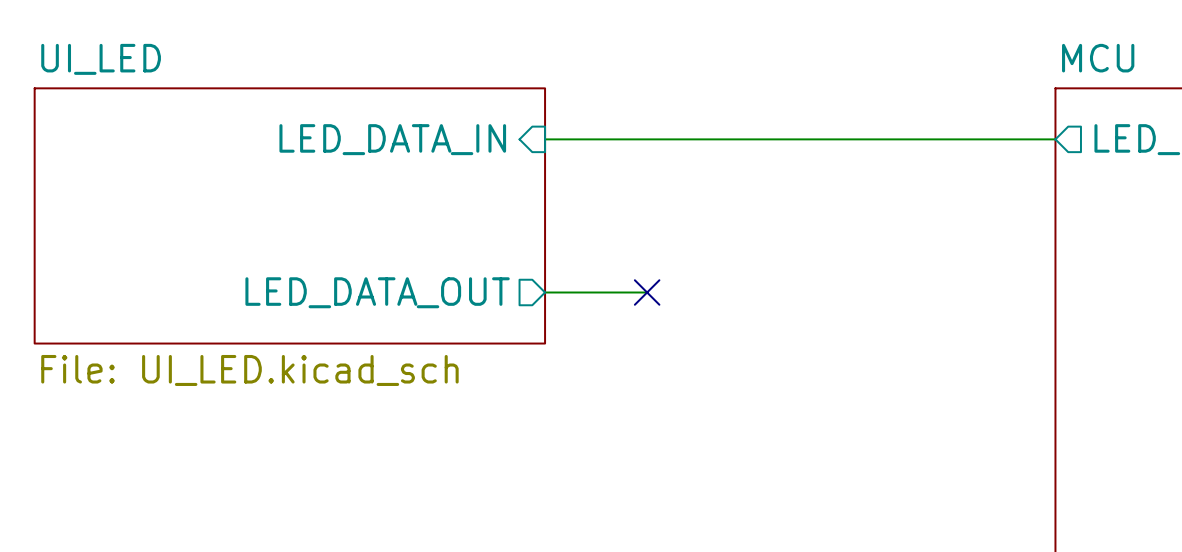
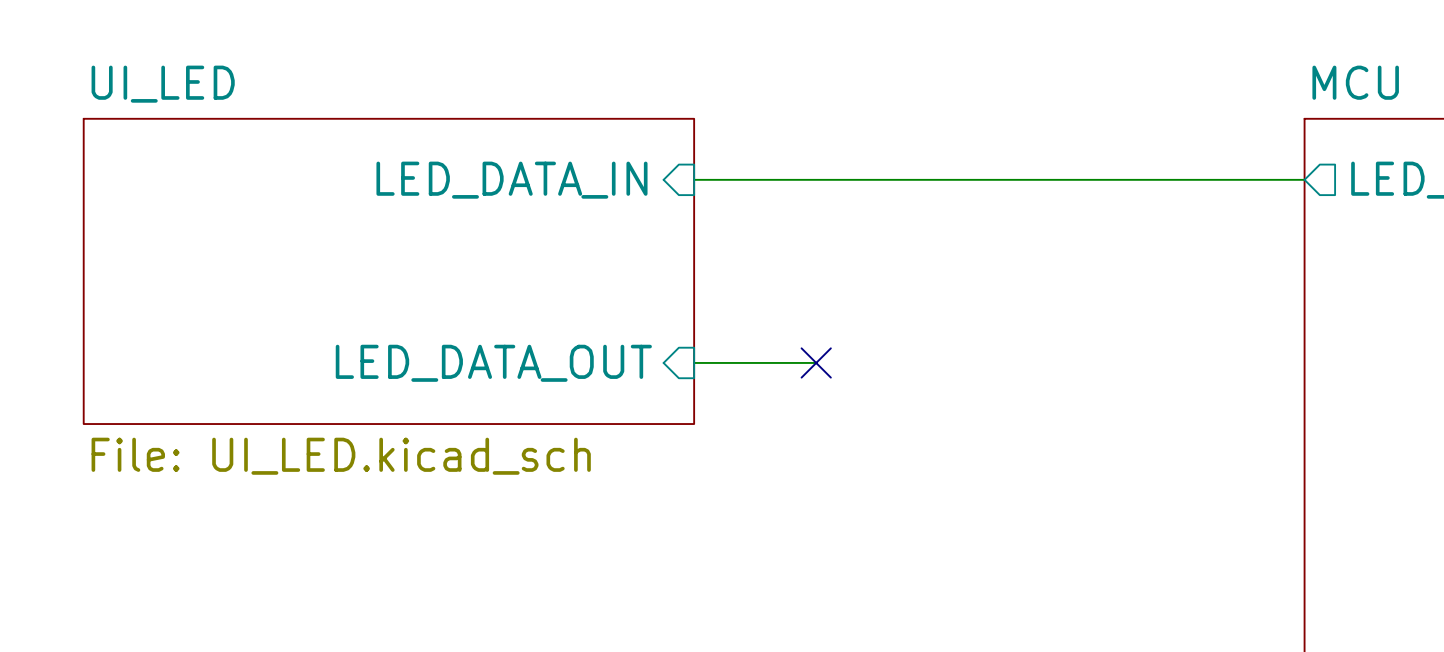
sheet pin shape: output (377, 292) -> input (493, 363)

